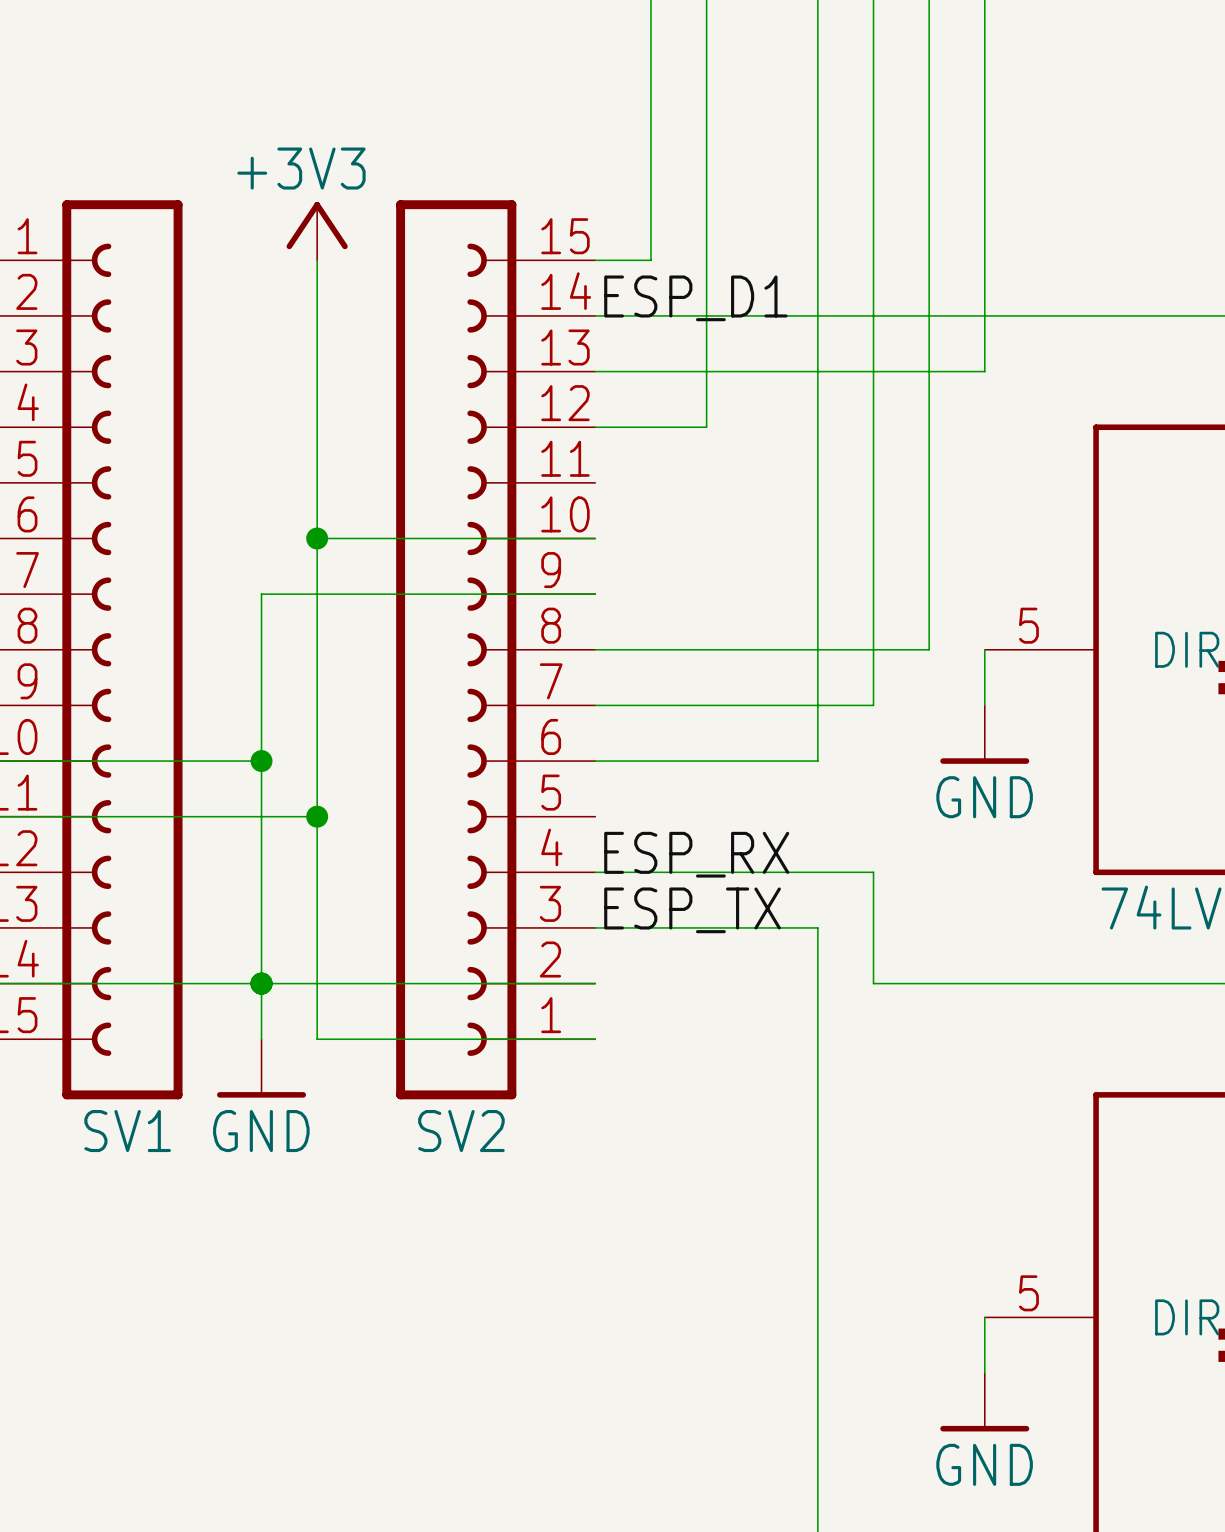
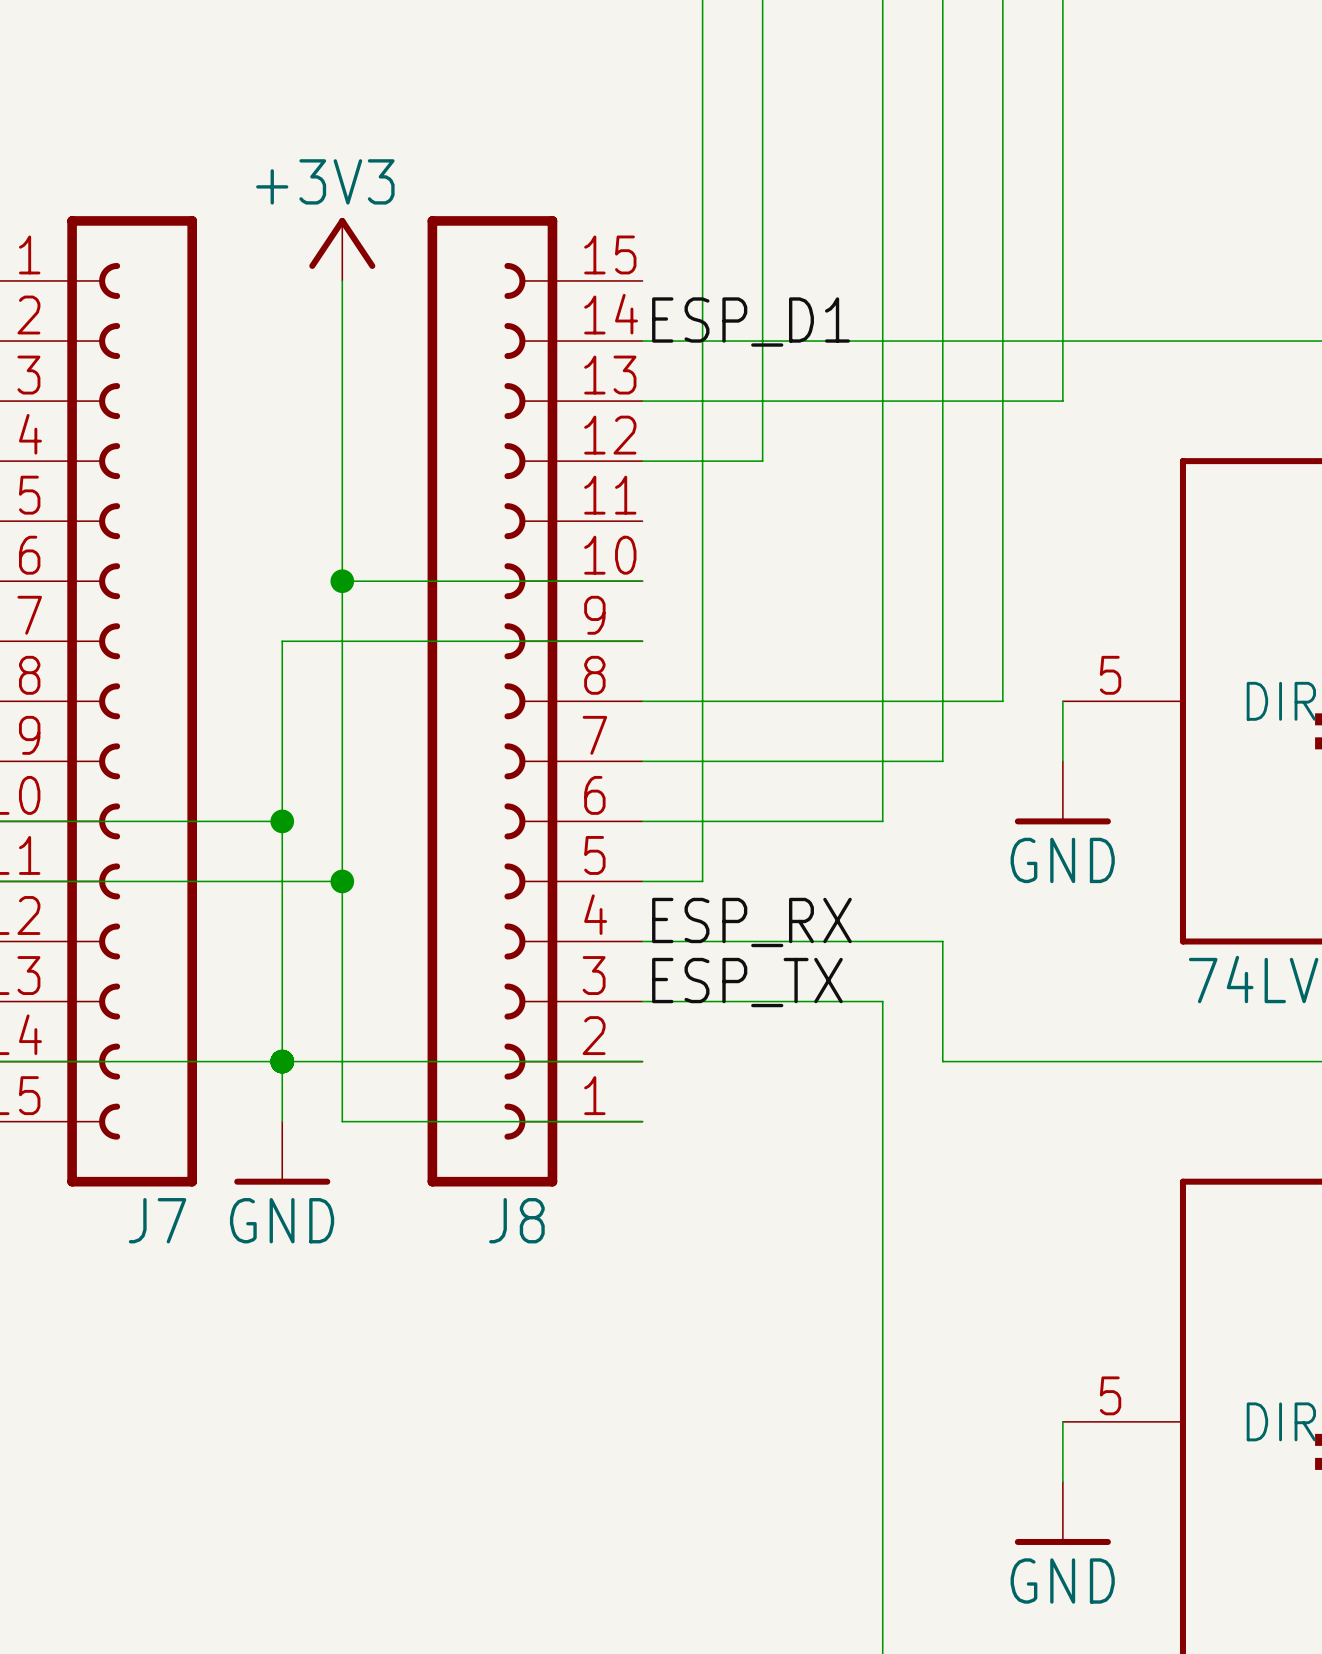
wire: (595, 260) (650, 260) -> (642, 881) (702, 881) (702, 280)
SV1 name: SV1 (127, 1131) -> J7 (157, 1220)
SV2 name: SV2 (461, 1131) -> J8 (516, 1220)

